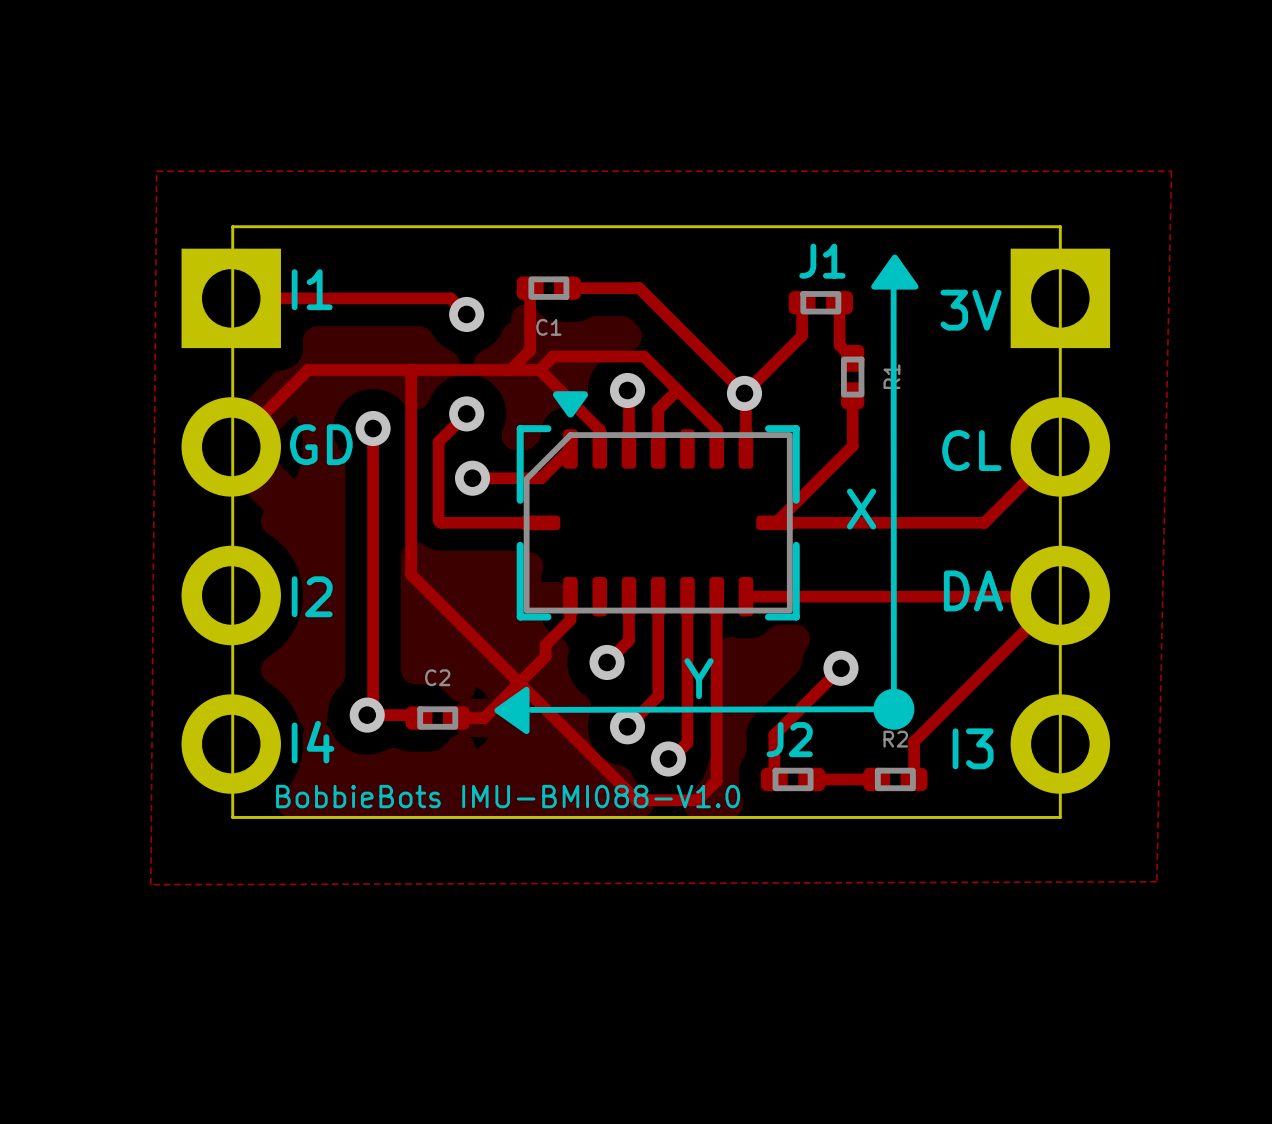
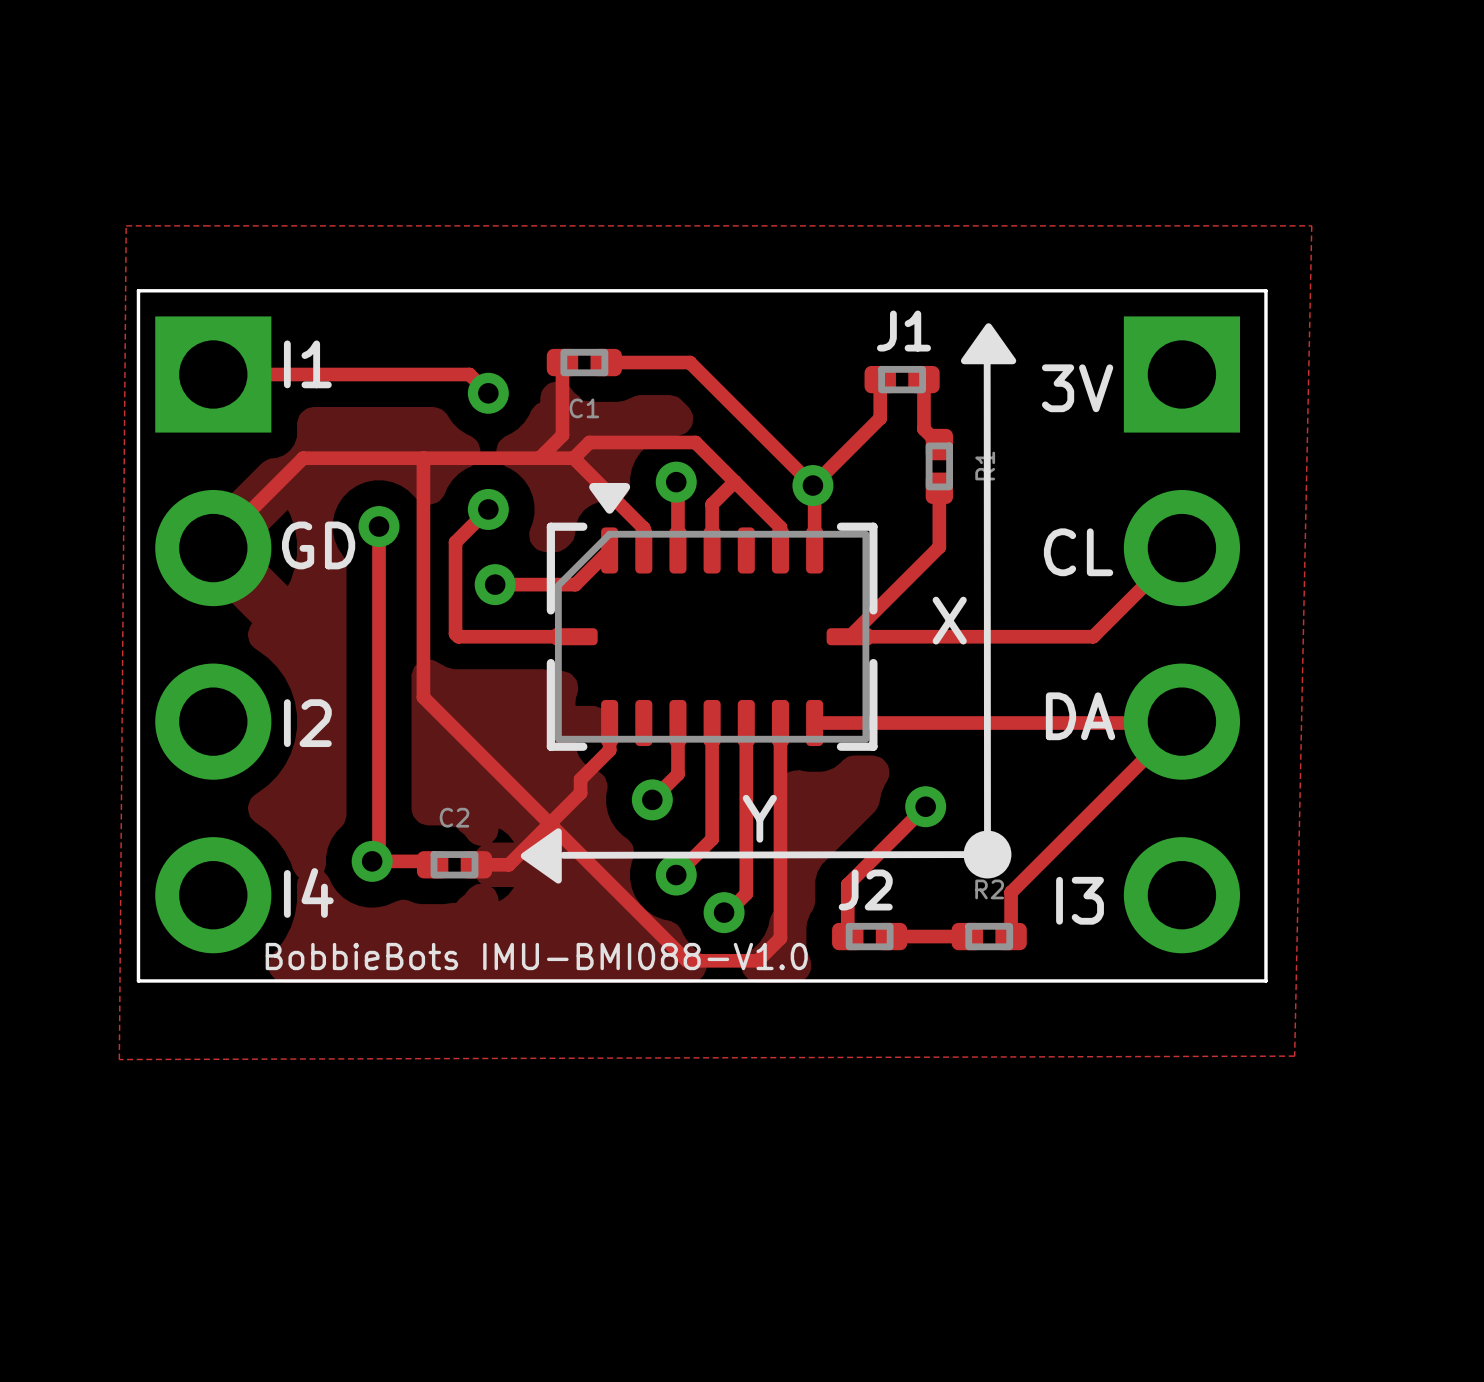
board edge: (232, 226) (232, 817) -> (215, 290) (138, 290) (138, 980) (215, 980)
board edge: (1060, 226) (1060, 817) -> (1181, 290) (1265, 290) (1265, 980) (1181, 980)

